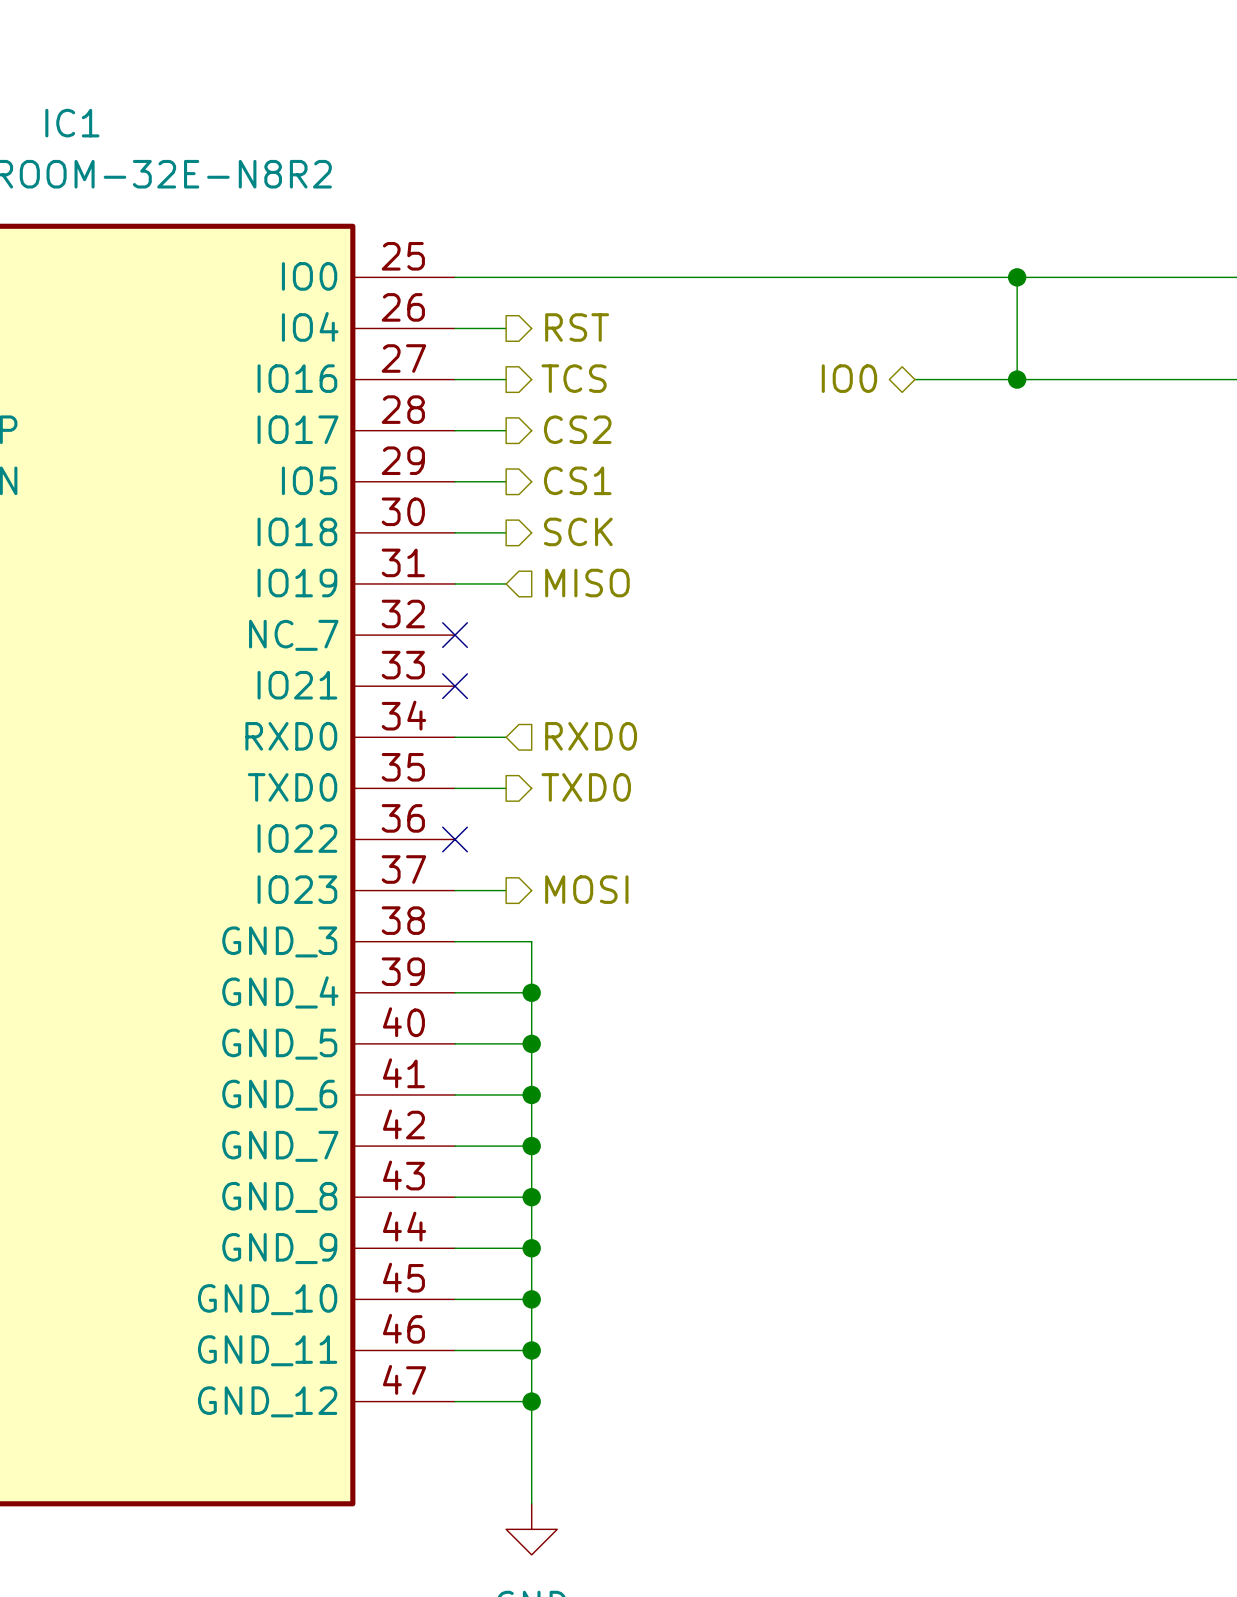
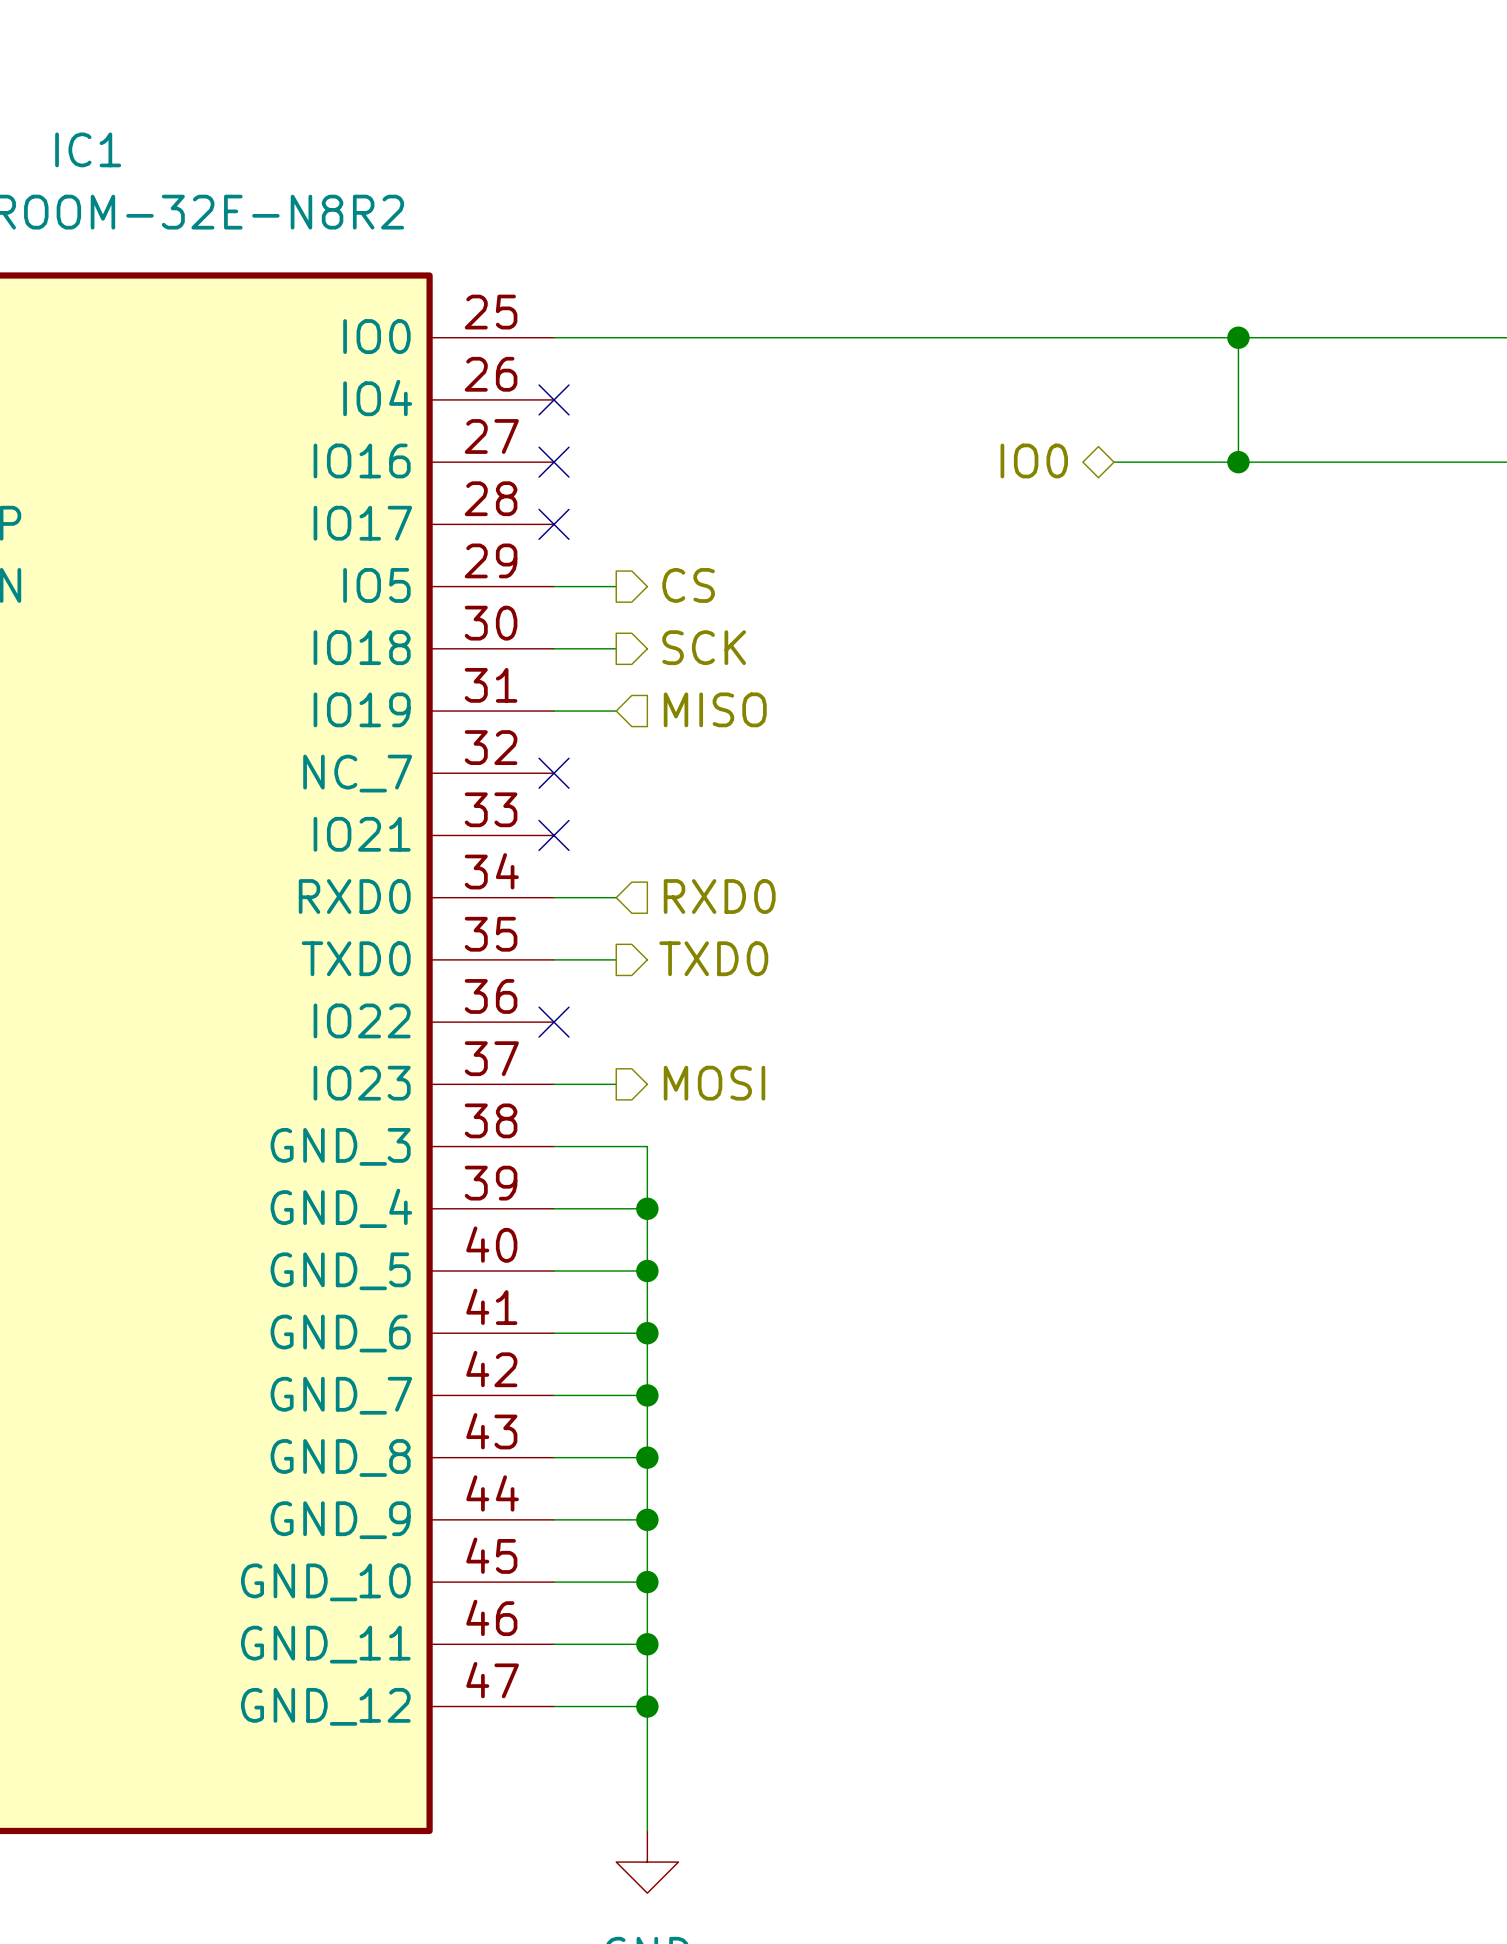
hierarchical label: RST (577, 327) -> none
wire: (455, 328) (506, 328) -> none
no-connect mark: none -> (554, 399)
hierarchical label: TCS (574, 378) -> none
wire: (455, 379) (506, 379) -> none
no-connect mark: none -> (554, 462)
hierarchical label: CS2 (577, 429) -> none
wire: (455, 430) (506, 430) -> none
no-connect mark: none -> (554, 524)
hierarchical label: CS1 (577, 480) -> CS (688, 585)

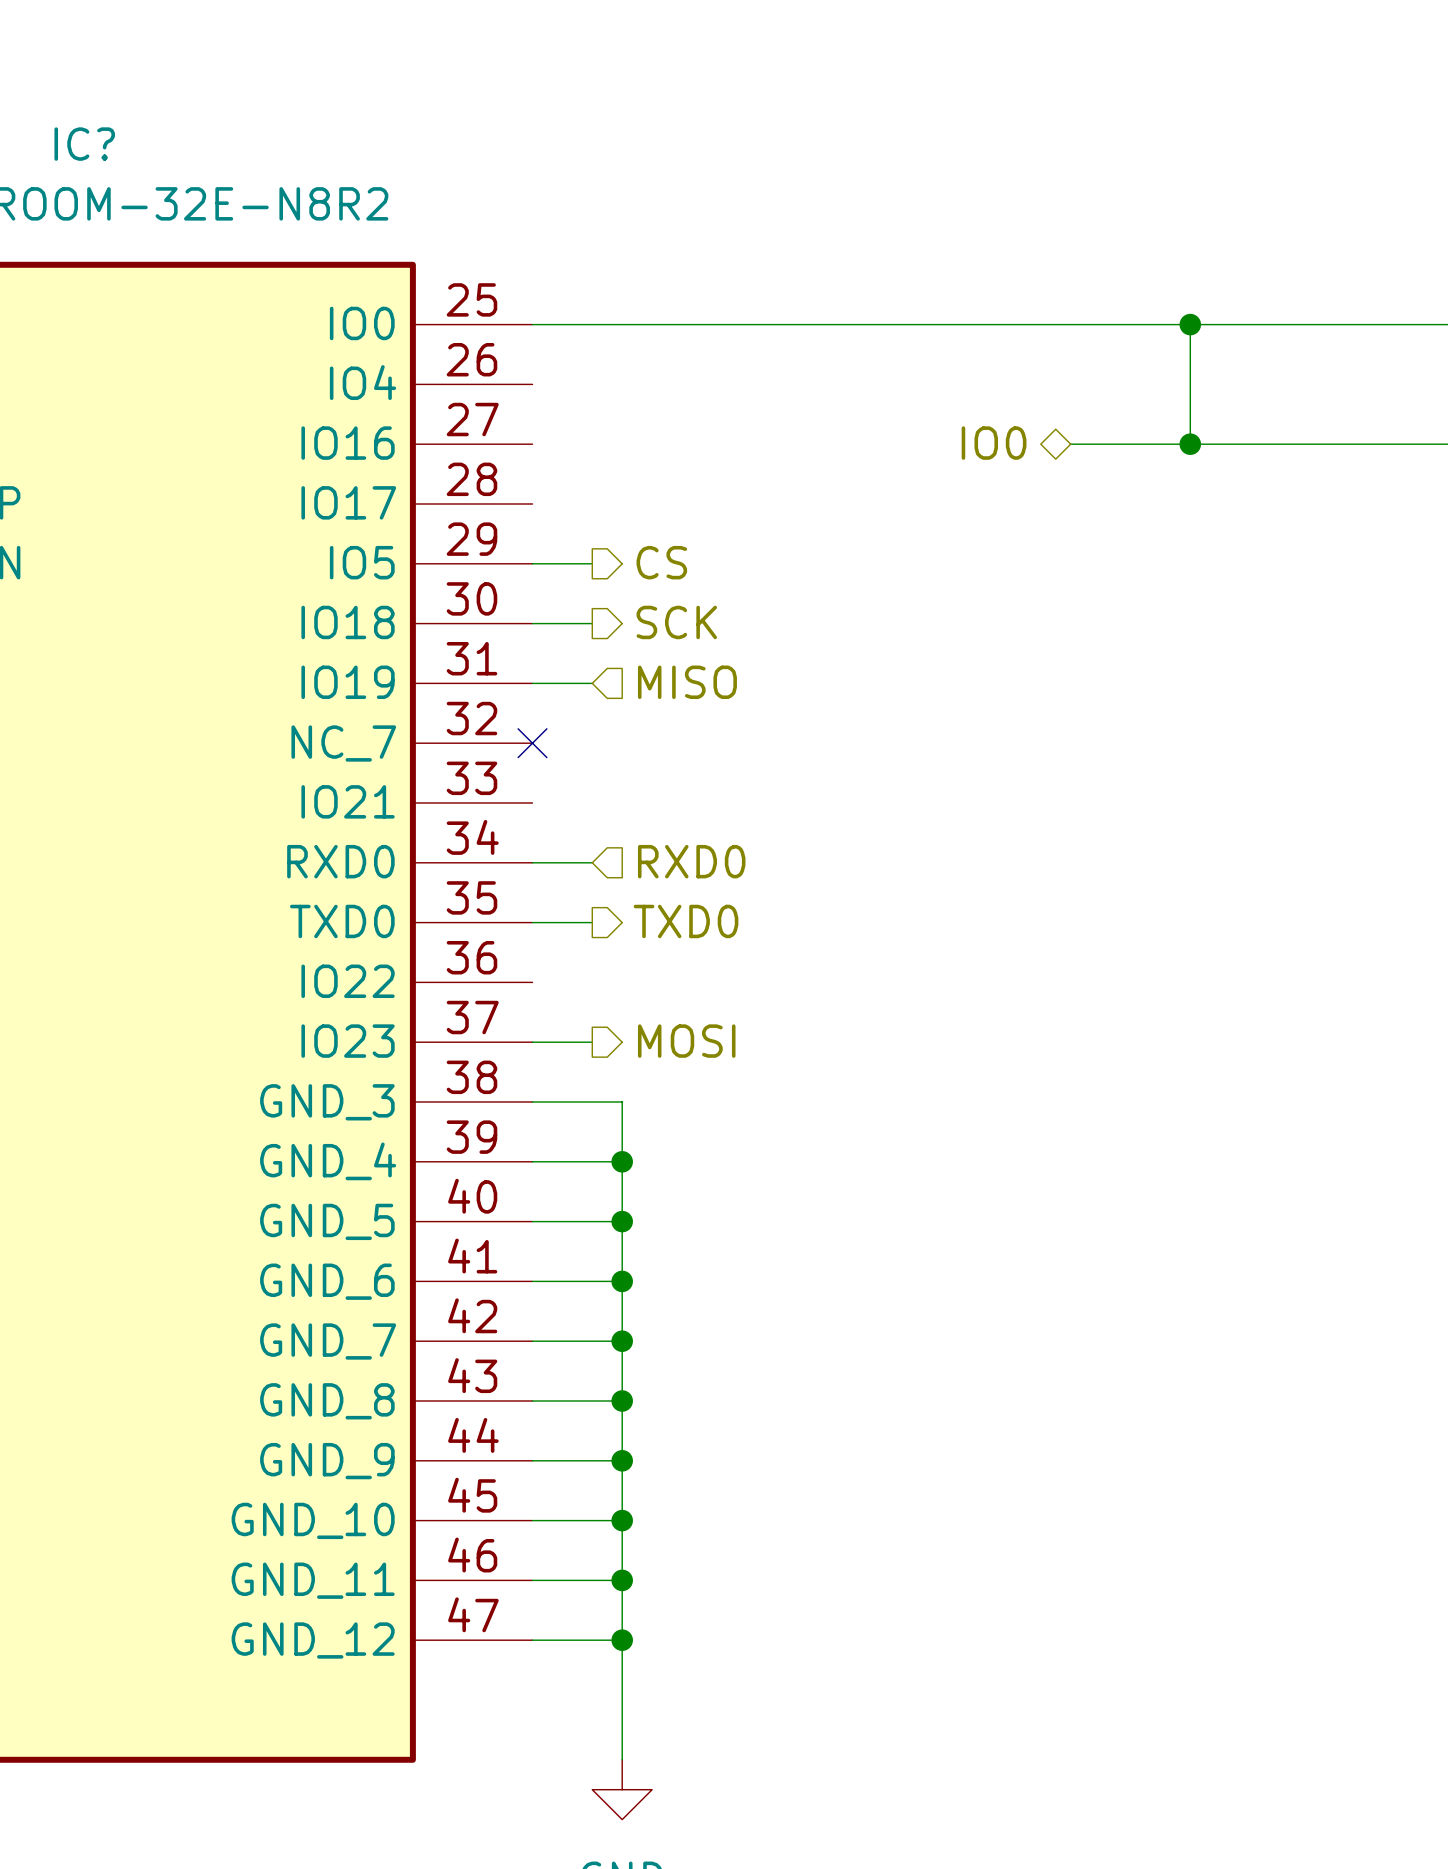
IC1 name: IC1 (88, 149) -> IC? (84, 144)
no-connect mark: (554, 399) -> none
no-connect mark: (554, 462) -> none
no-connect mark: (554, 524) -> none
no-connect mark: (554, 835) -> none
no-connect mark: (554, 1022) -> none

